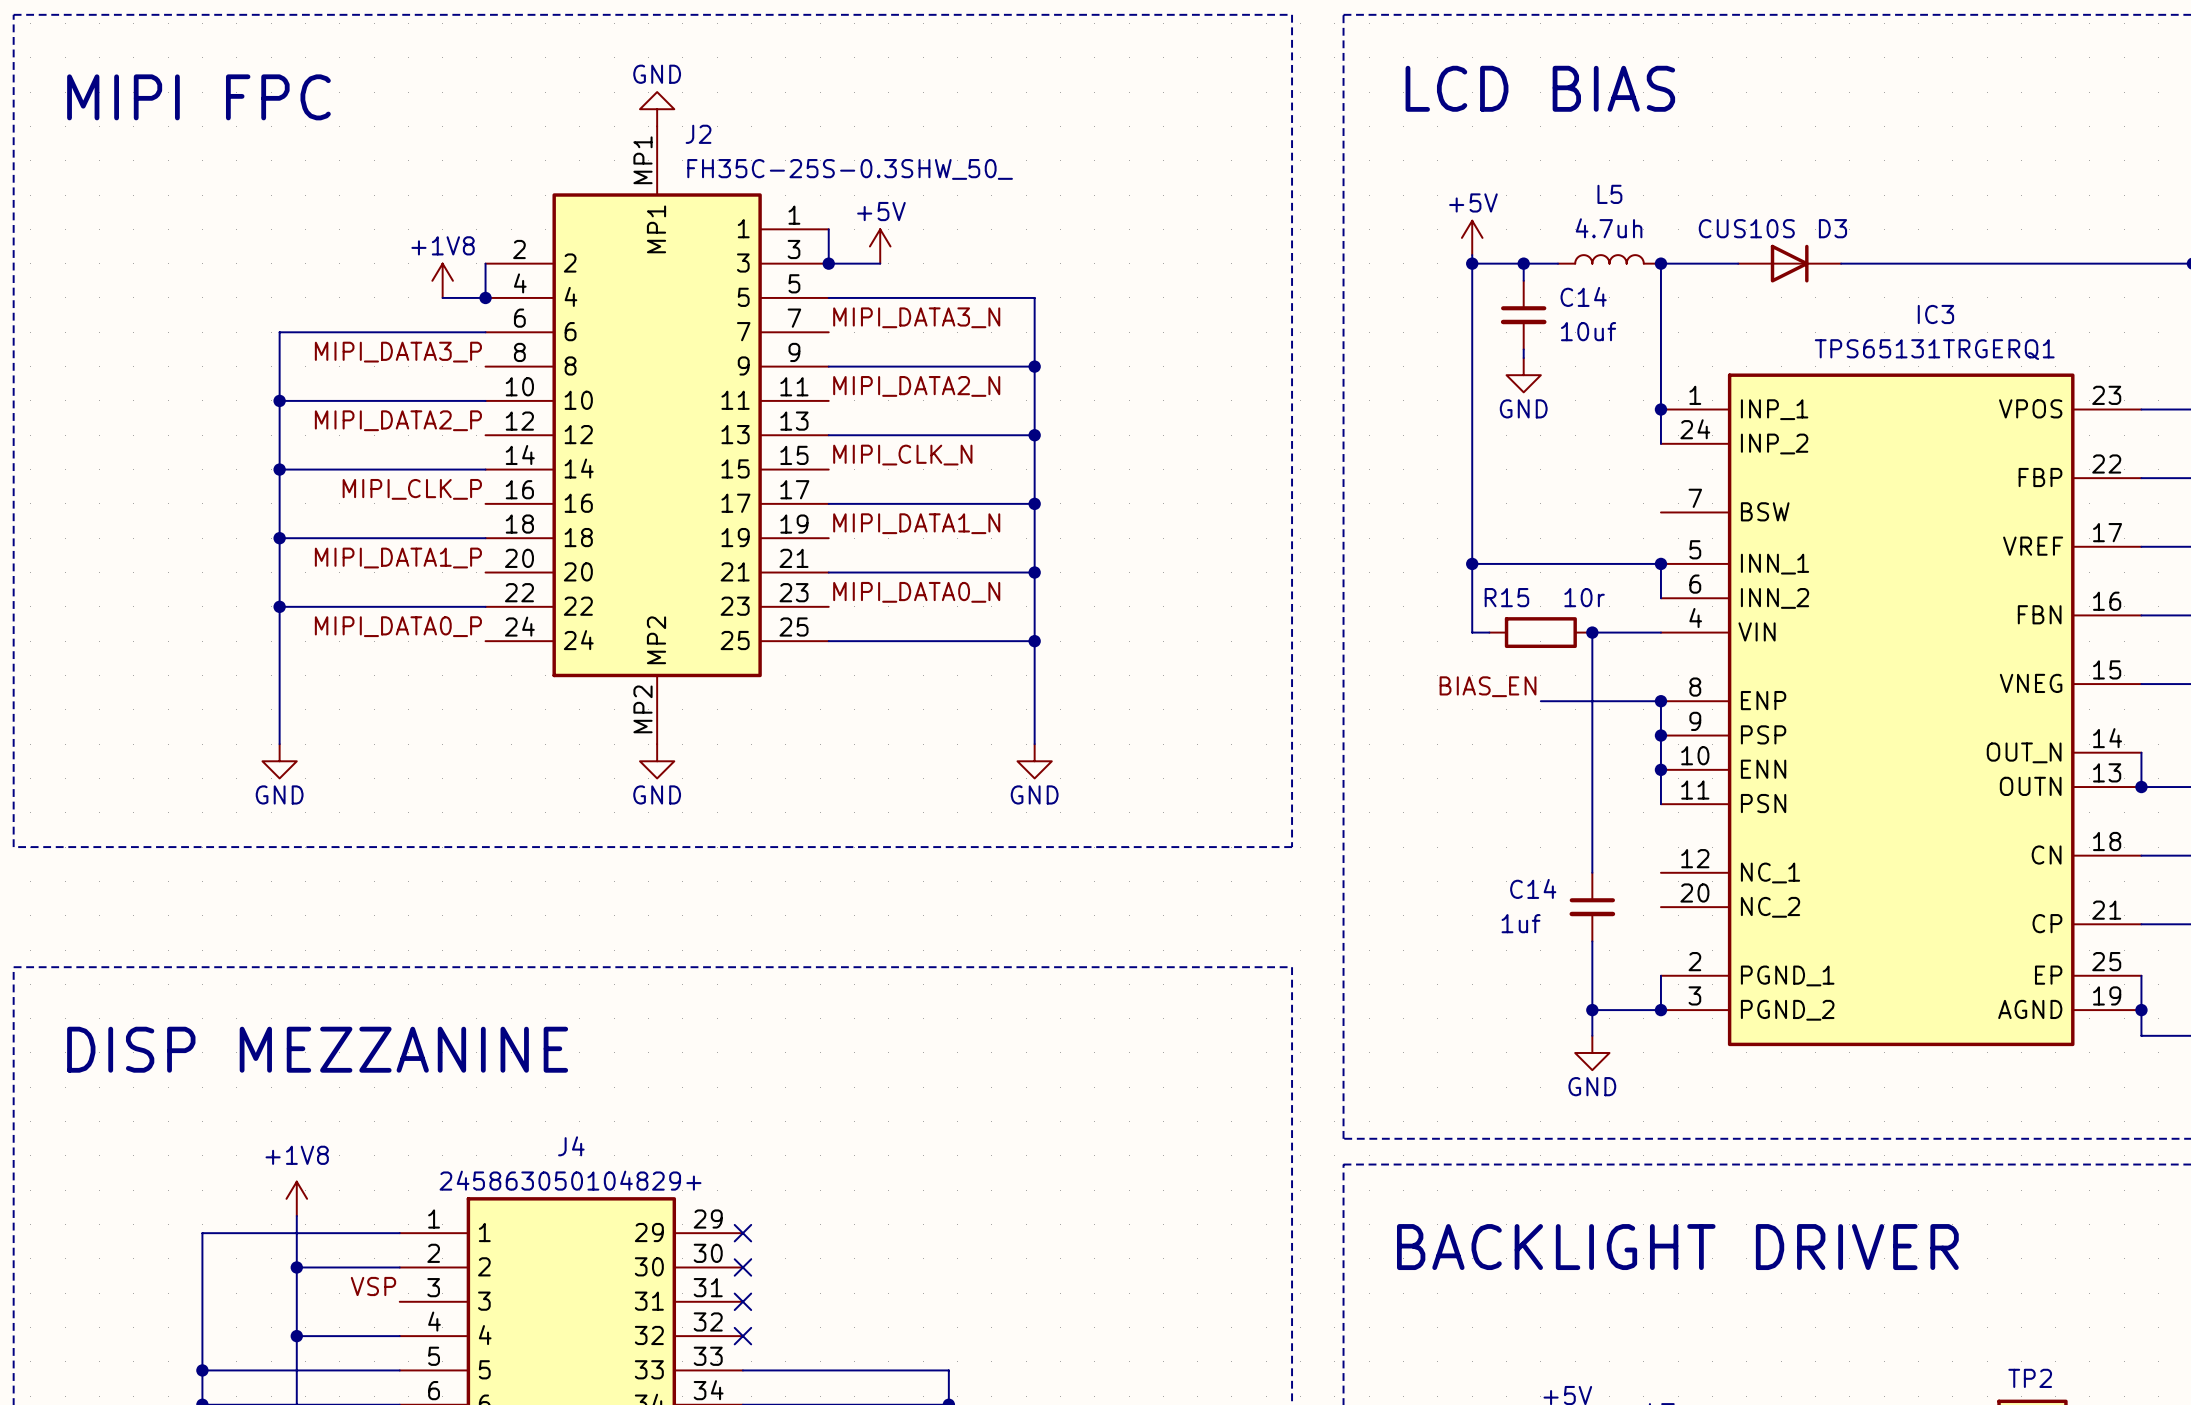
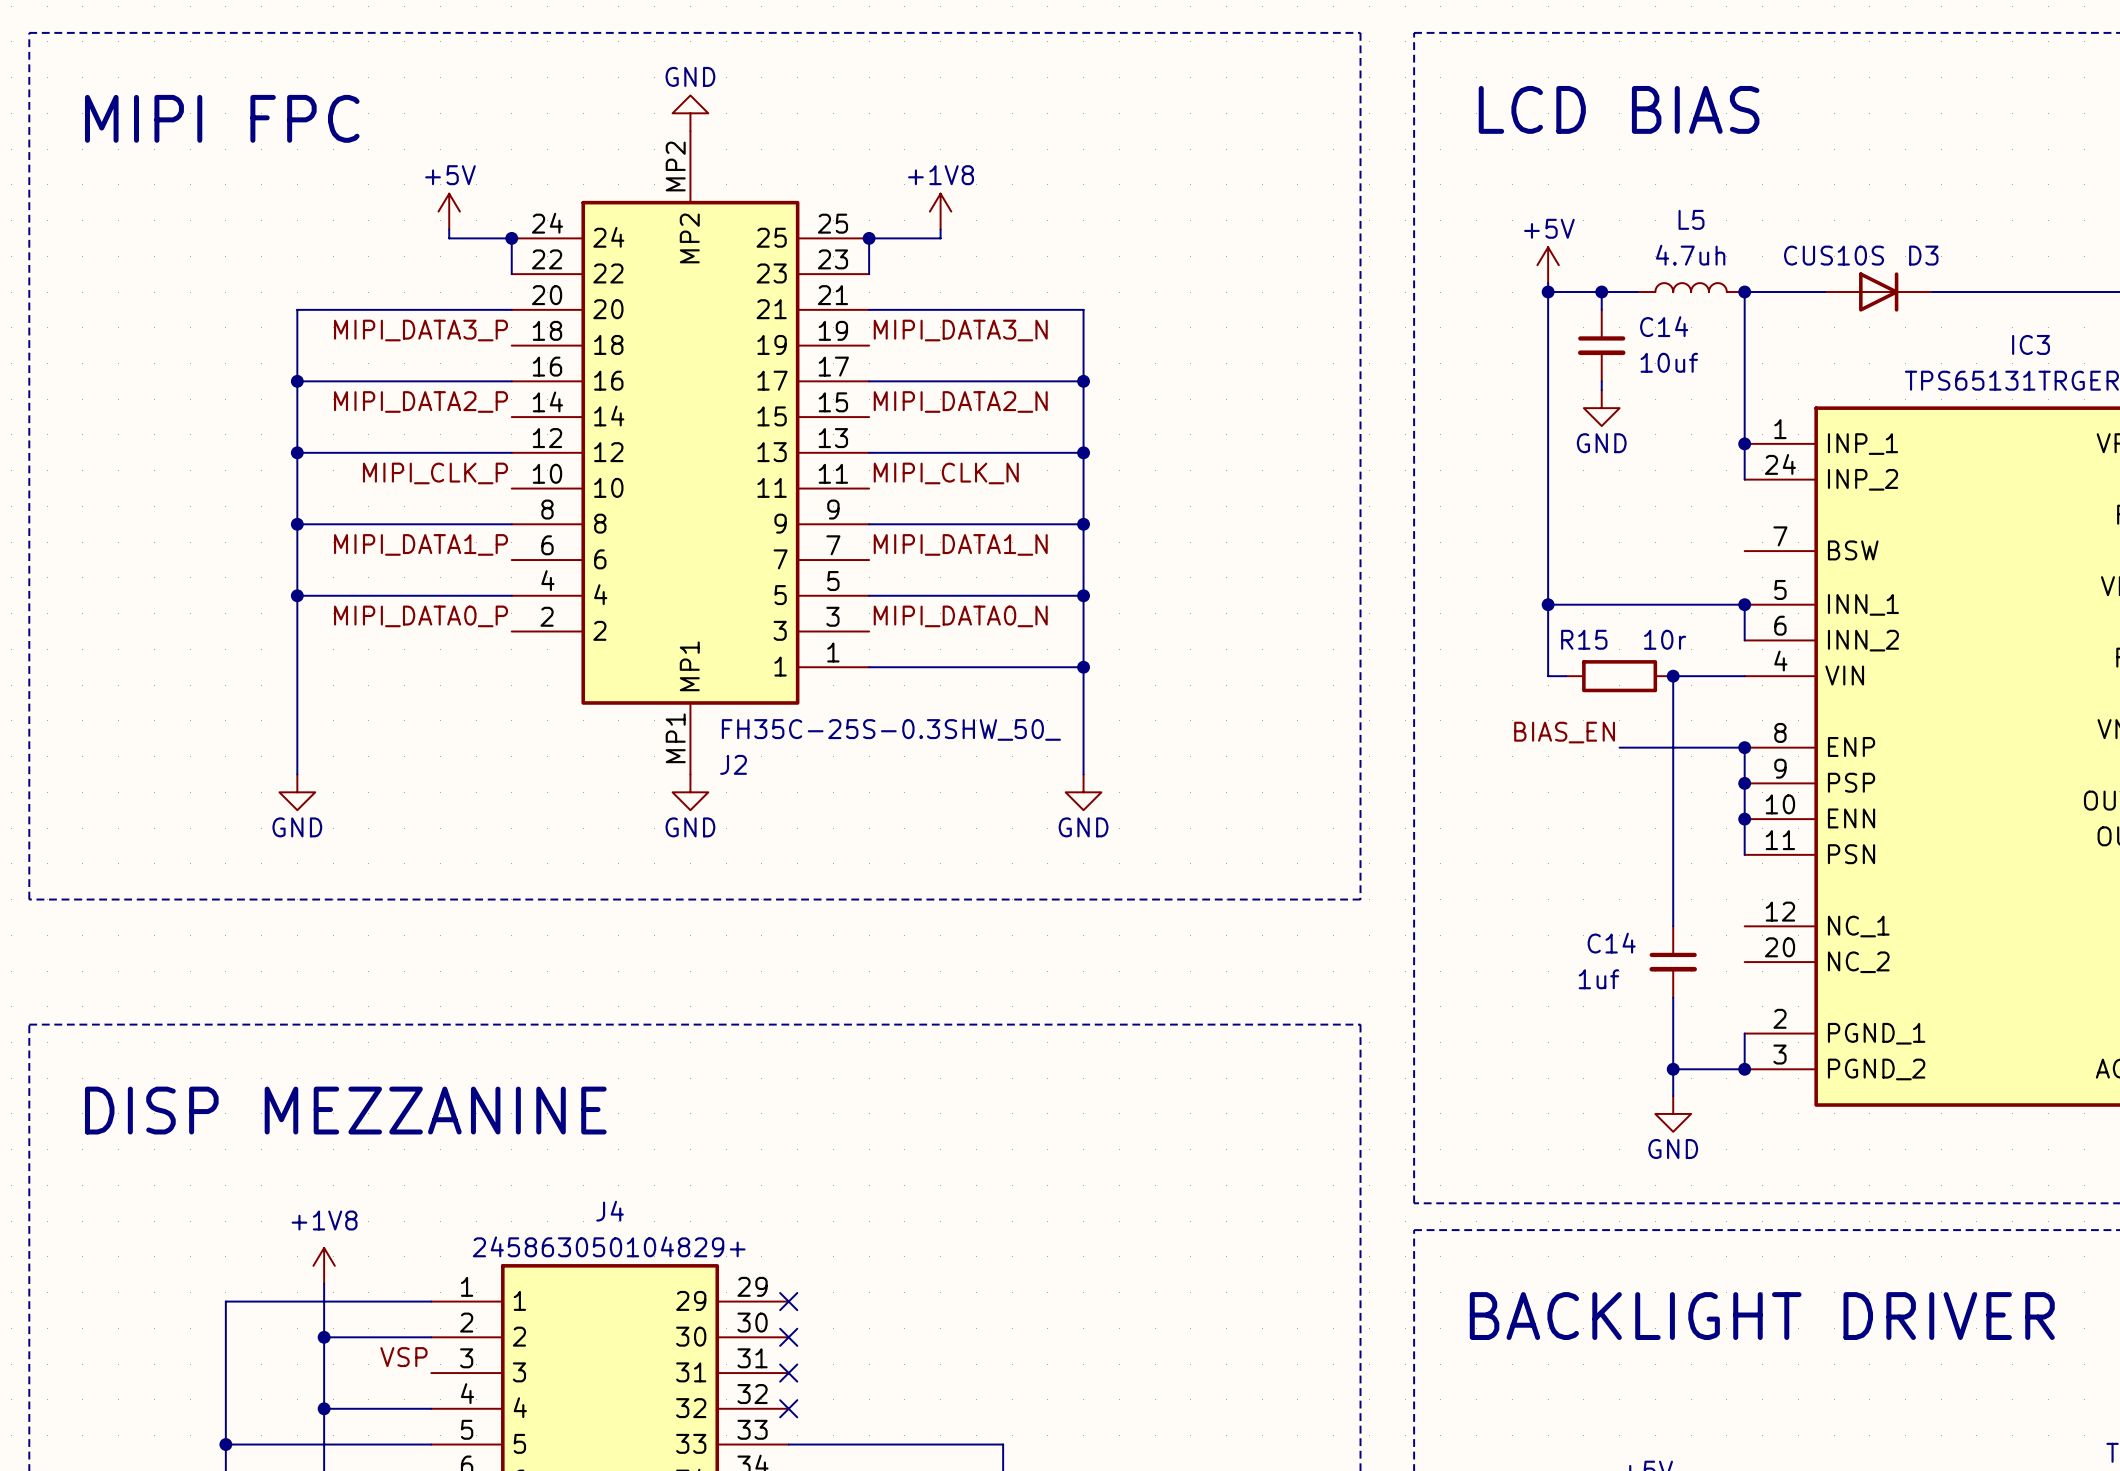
power symbol position: GND (657, 109) -> GND (690, 113)
power symbol: none -> +5V (449, 211)
power symbol: none -> +1V8 (940, 211)
wire: none -> (449, 229) (449, 238) (511, 238) (511, 274)
wire: none -> (940, 229) (940, 238) (869, 238) (869, 274)
junction: none -> (511, 238)
wire: (828, 229) (828, 263) (880, 263) -> none
power symbol: +5V (880, 246) -> none
wire: (485, 263) (485, 297) (442, 297) -> none
junction position: (828, 263) -> (869, 238)
power symbol: +1V8 (442, 280) -> none
wire: none -> (511, 309) (297, 309) (297, 774)
junction: (485, 297) -> none
wire: (828, 297) (1034, 297) (1034, 744) -> (869, 309) (1083, 309) (1083, 774)
label position: MIPI_DATA3_N (916, 317) -> MIPI_DATA3_N (960, 330)
wire: (485, 332) (279, 332) (279, 606) -> none
junction: none -> (297, 381)
label position: MIPI_DATA3_P (398, 352) -> MIPI_DATA3_P (420, 330)
wire: (828, 366) (1034, 366) -> (869, 381) (1083, 381)
junction position: (1034, 366) -> (1083, 381)
label position: MIPI_DATA2_N (916, 386) -> MIPI_DATA2_N (960, 401)
wire: (279, 400) (485, 400) -> (297, 381) (511, 381)
junction position: (279, 400) -> (297, 452)
label position: MIPI_DATA2_P (398, 420) -> MIPI_DATA2_P (420, 401)
J2 flip: as is (657, 435) -> up-down (690, 452)
wire: (828, 435) (1034, 435) -> (869, 452) (1083, 452)
junction position: (1034, 435) -> (1083, 452)
label position: MIPI_CLK_N (902, 455) -> MIPI_CLK_N (946, 473)
wire: (279, 469) (485, 469) -> (297, 452) (511, 452)
junction position: (279, 469) -> (297, 524)
label position: MIPI_CLK_P (412, 489) -> MIPI_CLK_P (435, 473)
wire: (828, 503) (1034, 503) -> (869, 524) (1083, 524)
junction position: (1034, 503) -> (1083, 524)
label position: MIPI_DATA1_N (916, 523) -> MIPI_DATA1_N (960, 544)
wire: (279, 538) (485, 538) -> (297, 524) (511, 524)
junction position: (279, 538) -> (297, 595)
label position: MIPI_DATA1_P (398, 558) -> MIPI_DATA1_P (420, 544)
wire: (828, 572) (1034, 572) -> (869, 595) (1083, 595)
junction position: (1034, 572) -> (1083, 595)
label position: MIPI_DATA0_N (916, 592) -> MIPI_DATA0_N (960, 616)
wire: (279, 606) (485, 606) -> (297, 595) (511, 595)
wire: (279, 606) (279, 744) -> none
junction: (279, 606) -> none
label position: MIPI_DATA0_P (398, 626) -> MIPI_DATA0_P (420, 616)
wire: (828, 641) (1034, 641) -> (869, 667) (1083, 667)
junction position: (1034, 641) -> (1083, 667)
power symbol position: GND (279, 761) -> GND (297, 792)
power symbol position: GND (657, 761) -> GND (690, 792)
power symbol position: GND (1034, 761) -> GND (1083, 792)

